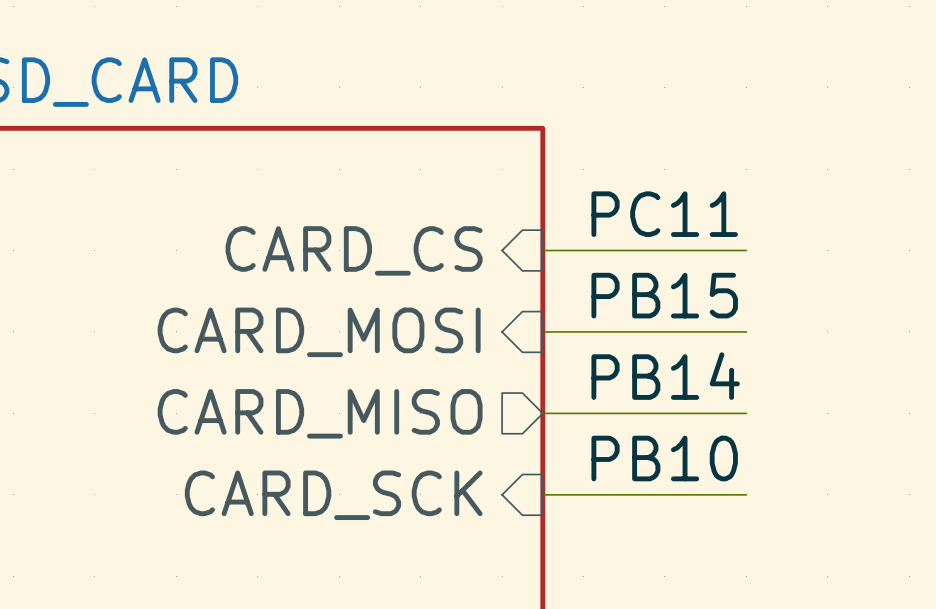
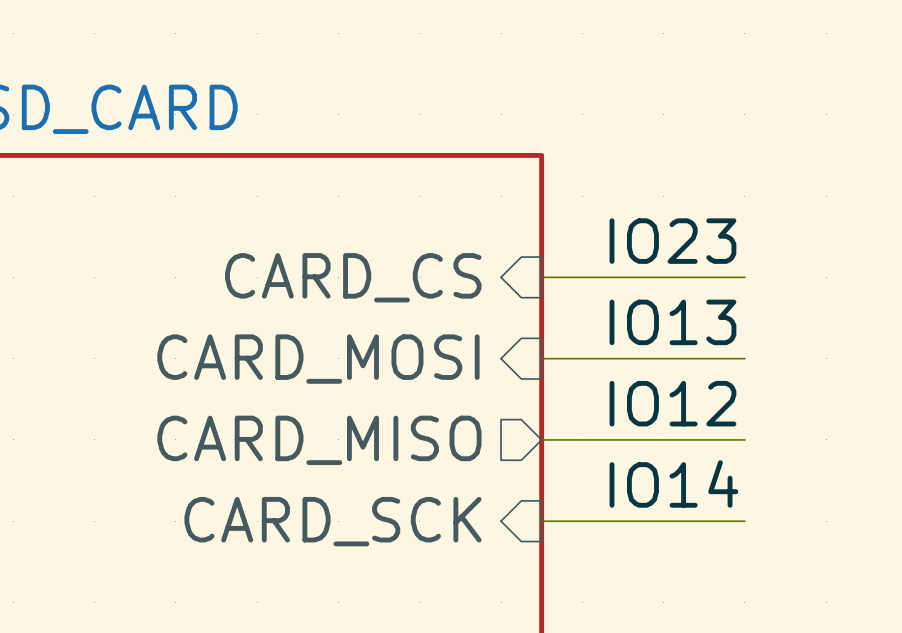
label: PC11 (664, 214) -> IO23 (672, 241)
label: PB15 (664, 295) -> IO13 (672, 322)
label: PB14 (665, 376) -> IO12 (672, 403)
label: PB10 (664, 458) -> IO14 (673, 483)

